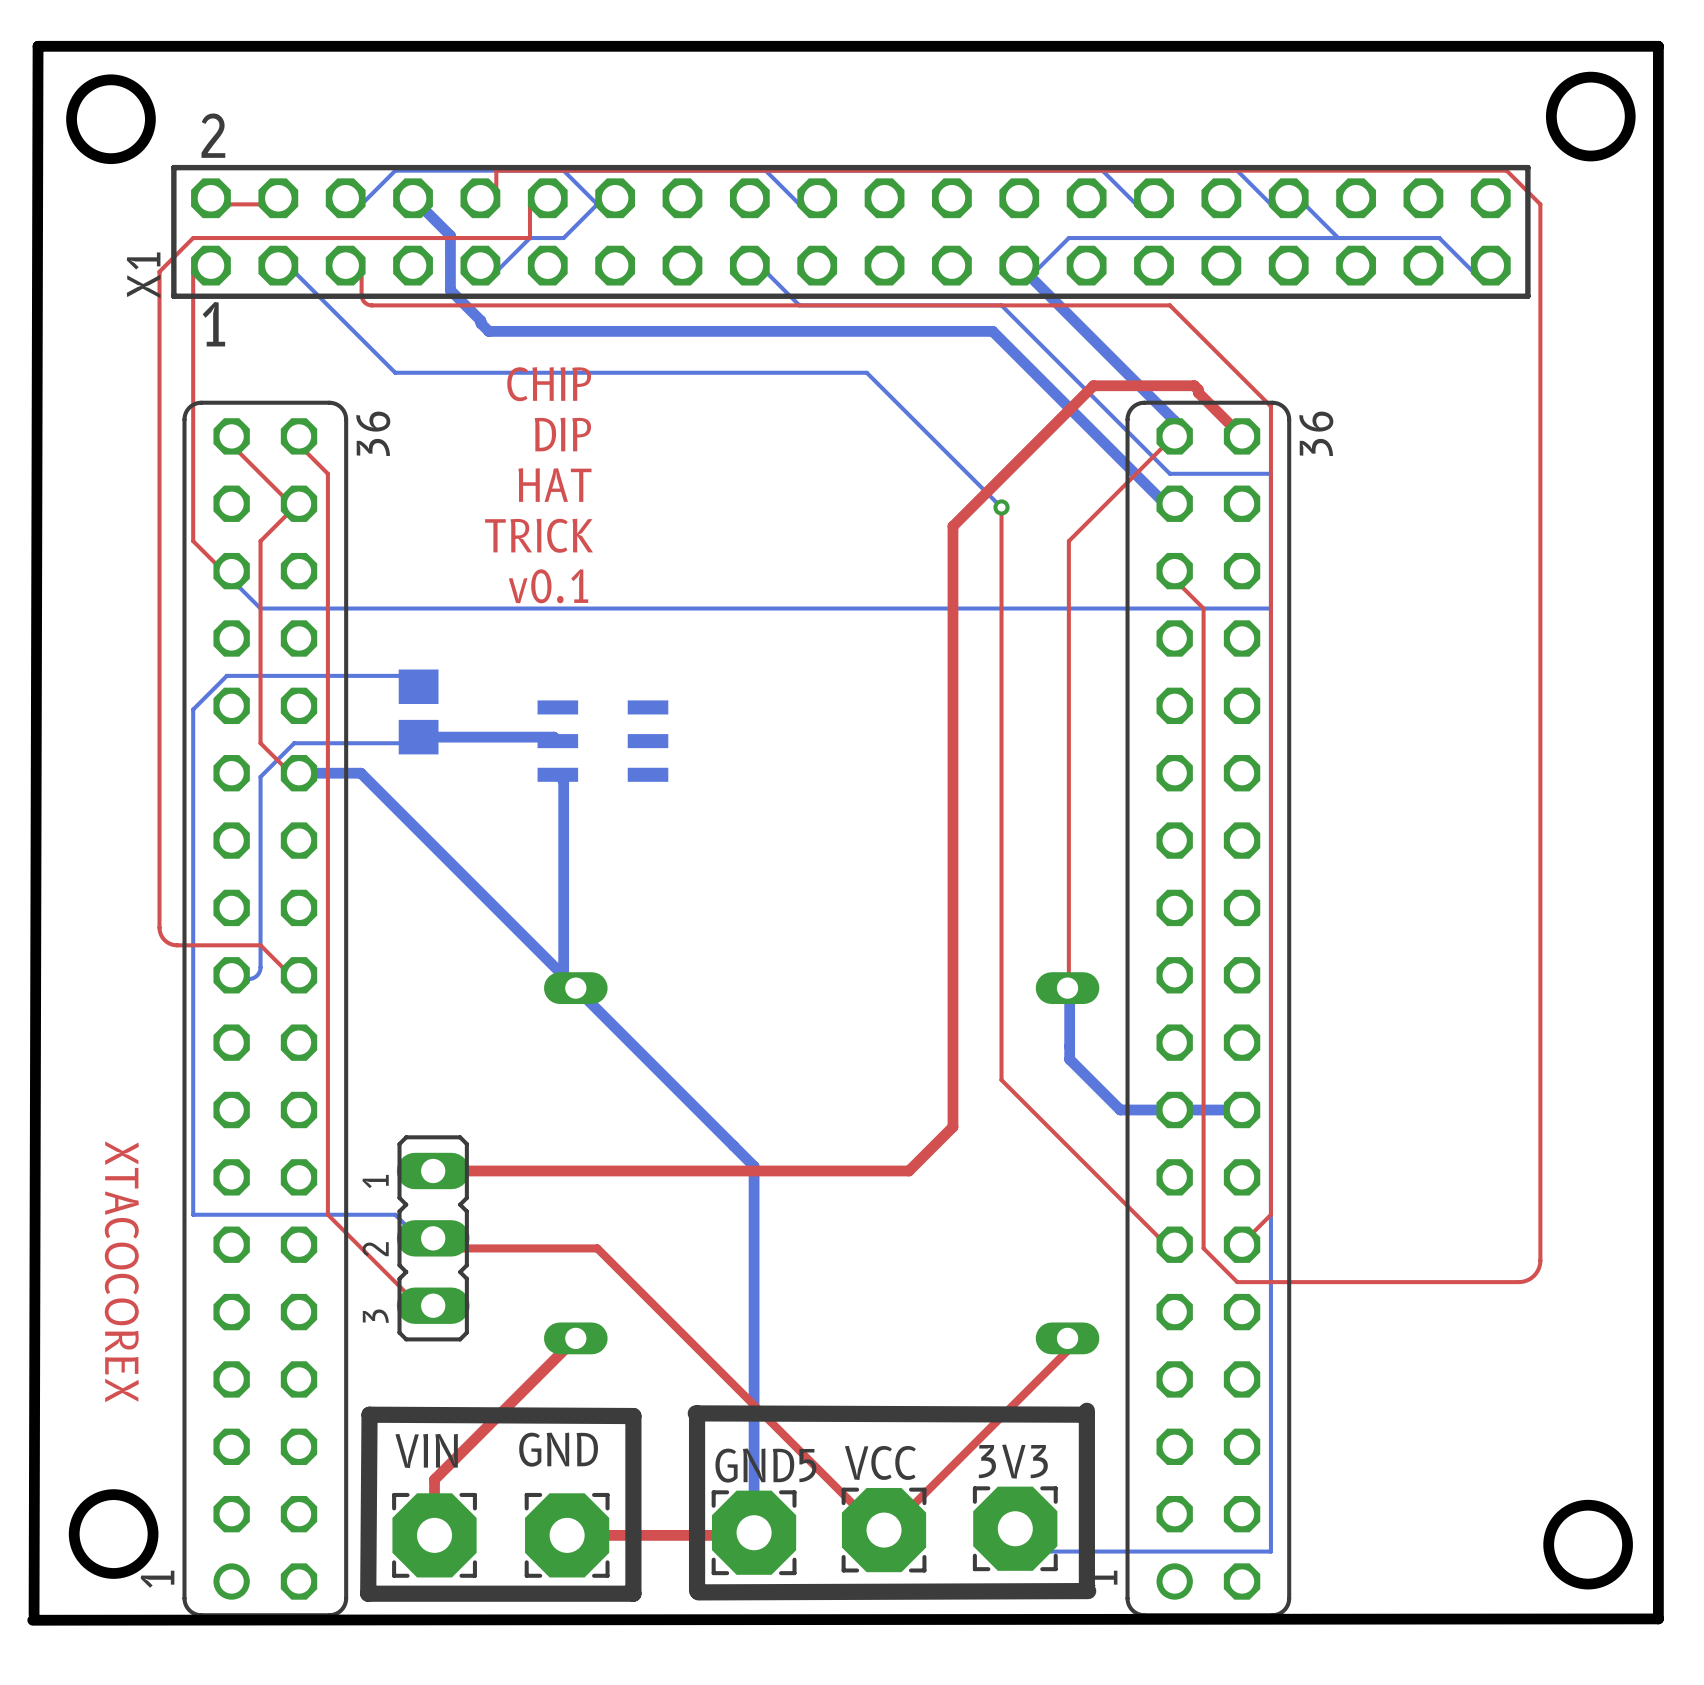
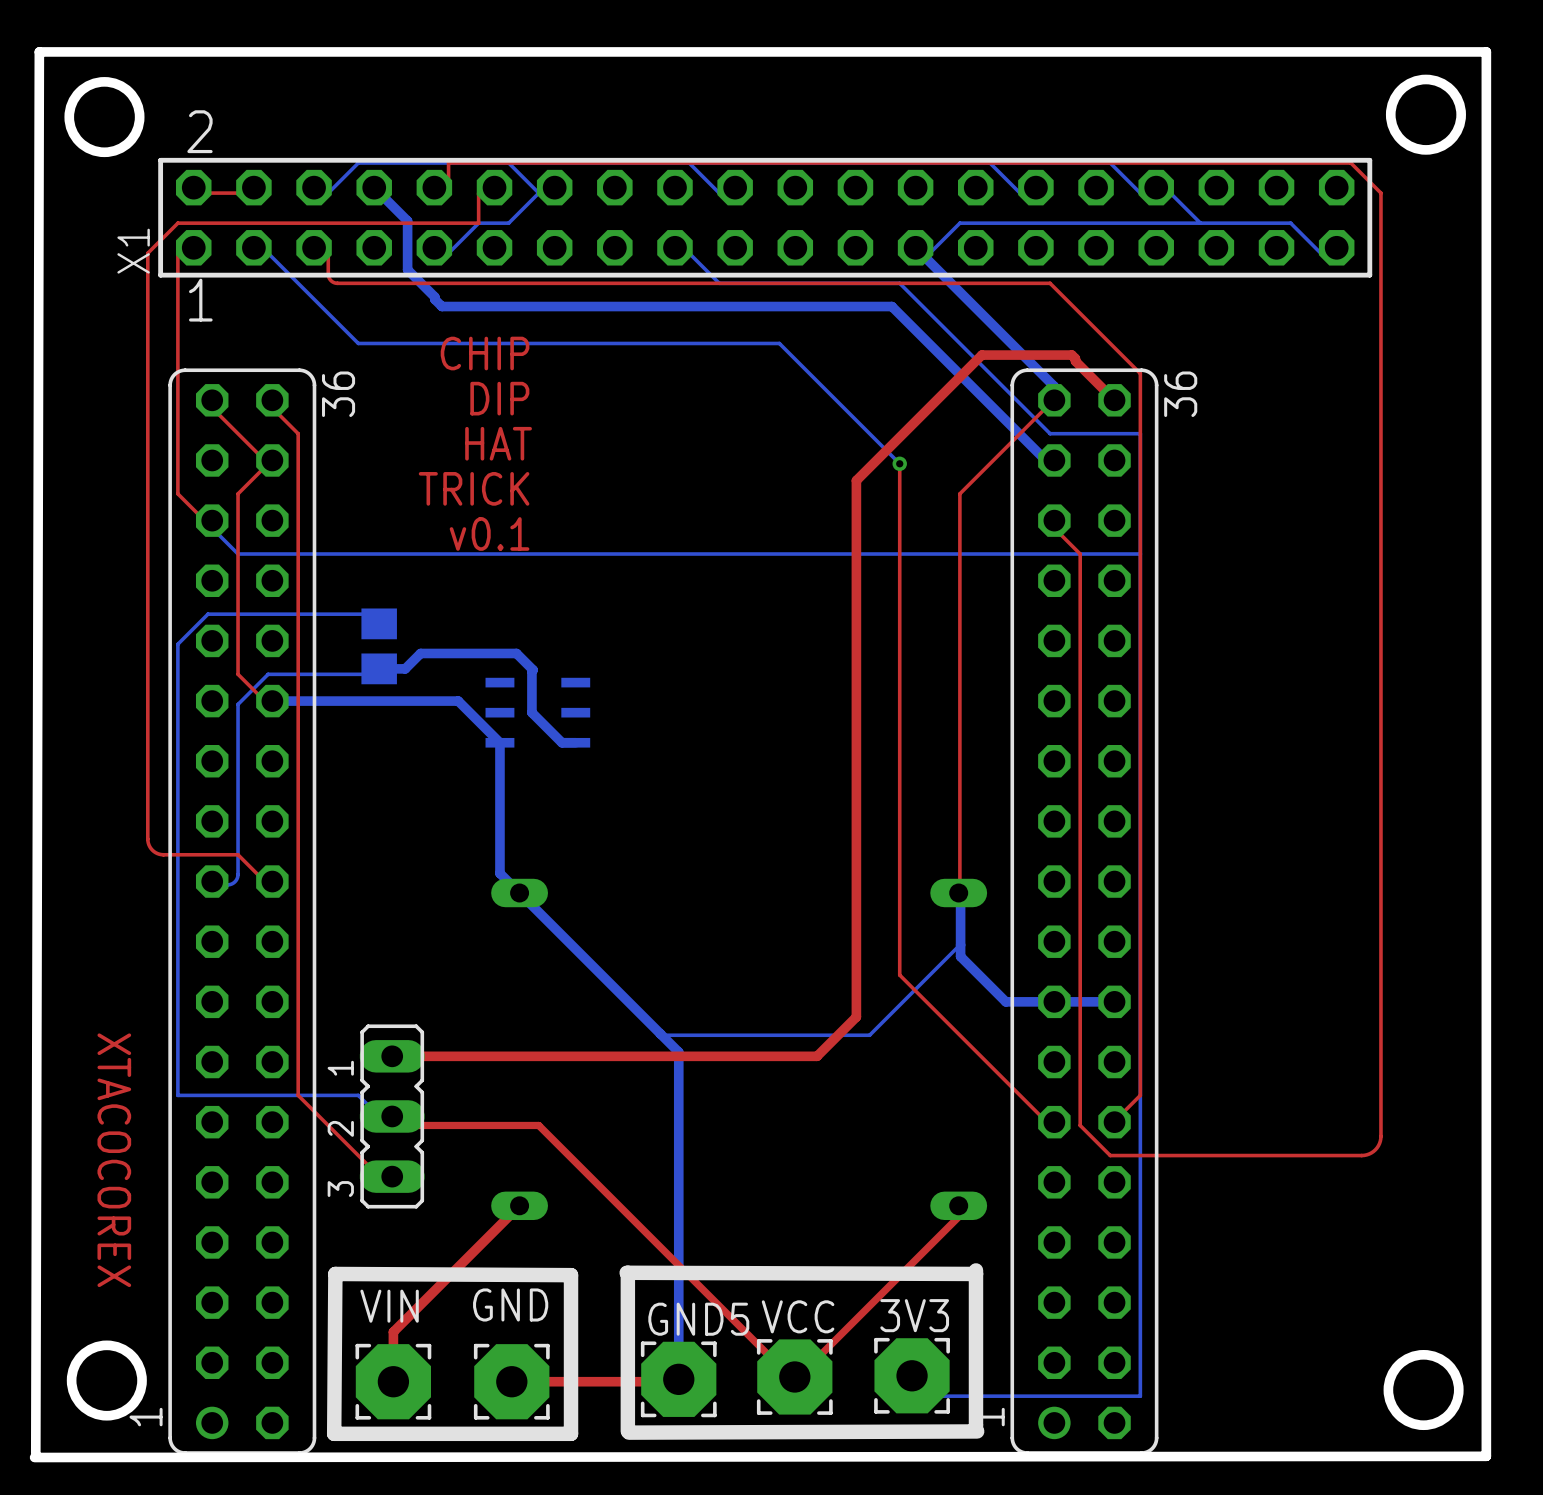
bottom track: (447, 737) (553, 737) (557, 741) -> (405, 668) (420, 653) (516, 653) (533, 670) (531, 712) (562, 742) (575, 742)
part: (602, 741) -> none
bottom track: (360, 773) (553, 966) -> (327, 701) (458, 701) (499, 742) (499, 873)
bottom track: (557, 774) (563, 780) (563, 978) (575, 988) -> none
part: none -> (537, 712)
bottom track: none -> (959, 945) (869, 1035) (659, 1035)

